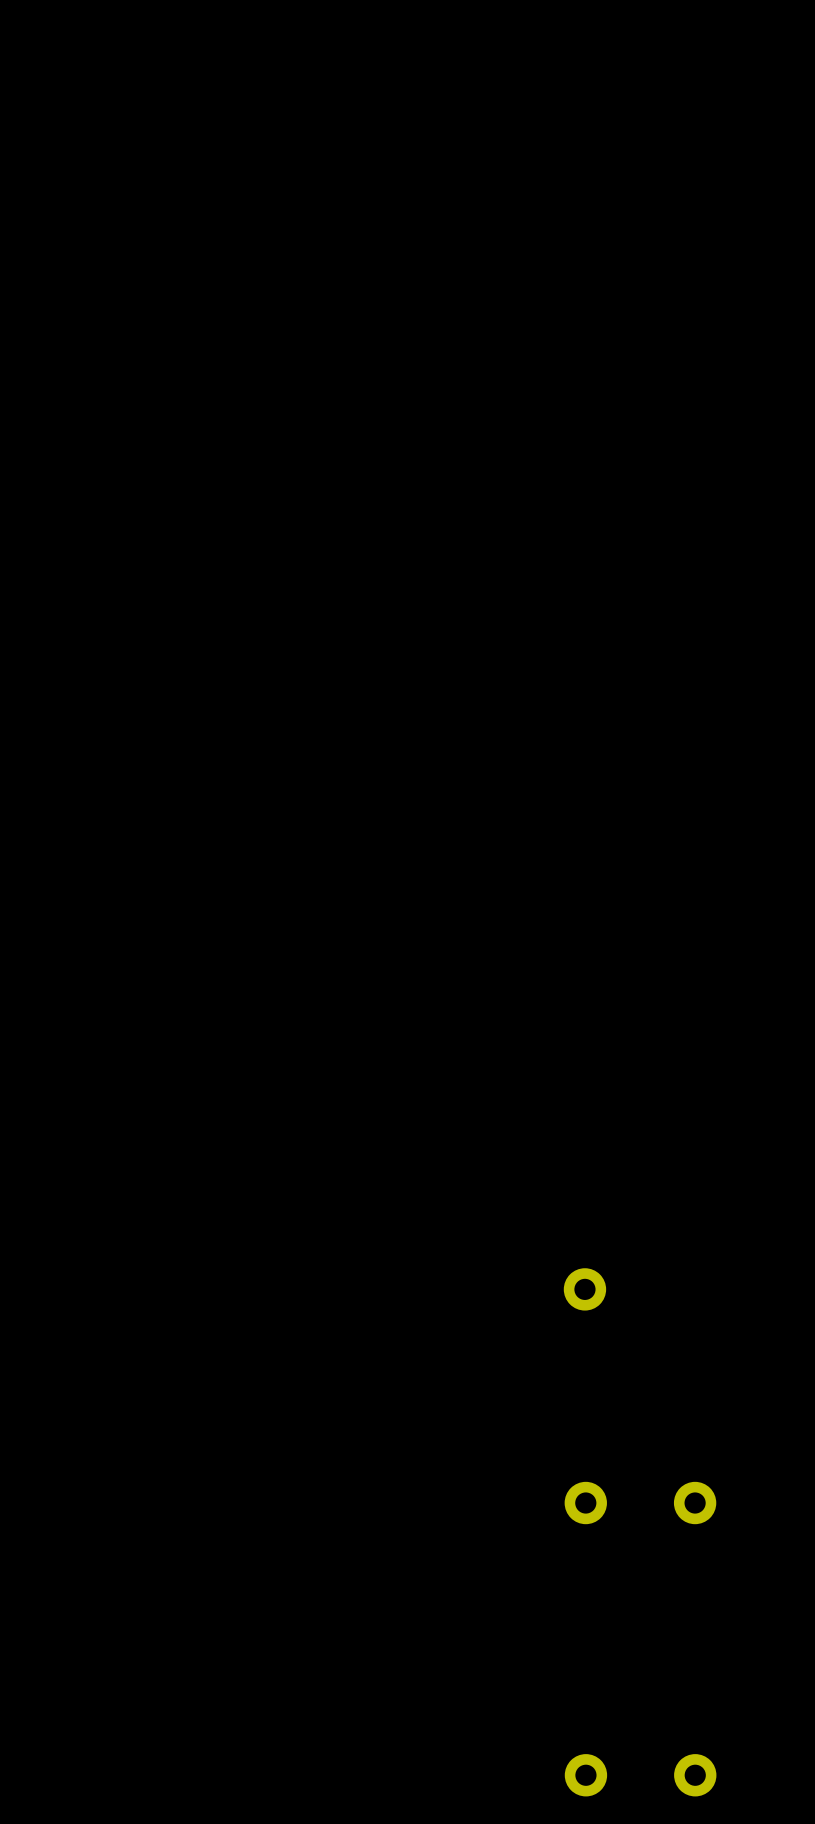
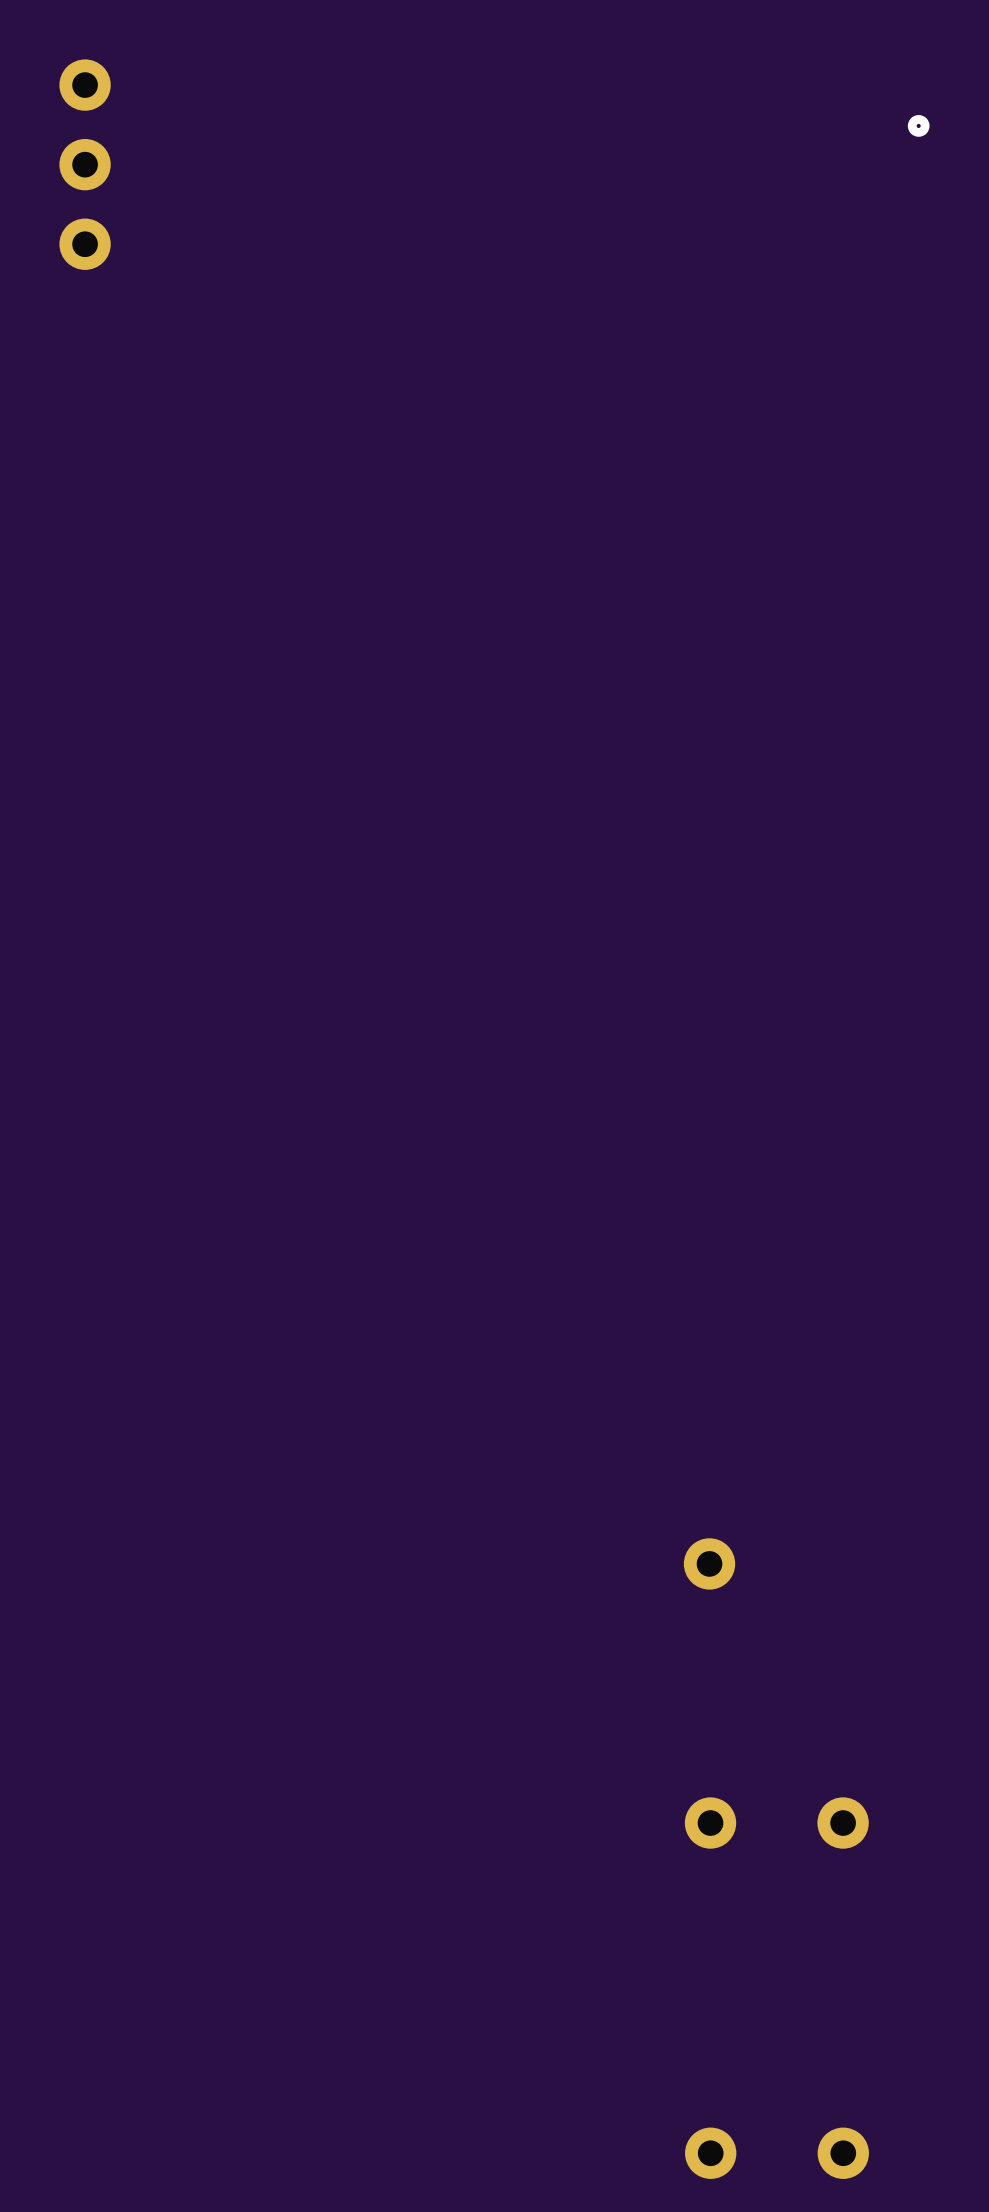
part: none -> (85, 85)
part: none -> (918, 125)
part: none -> (85, 164)
part: none -> (85, 244)

